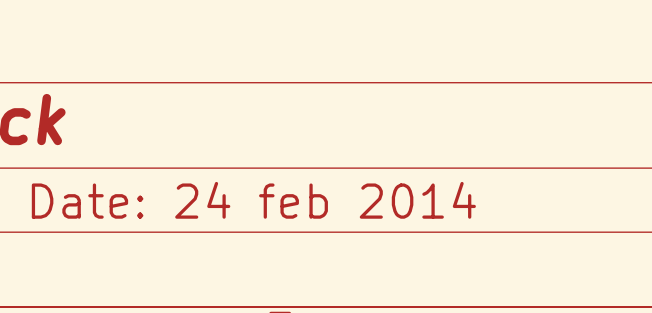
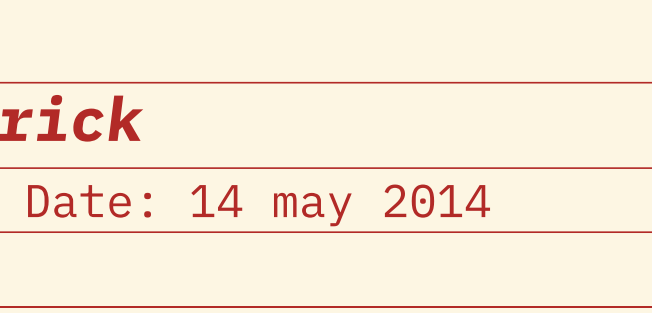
title block: Date: 24 feb 2014 (253, 200) -> Date: 14 may 2014 (259, 205)

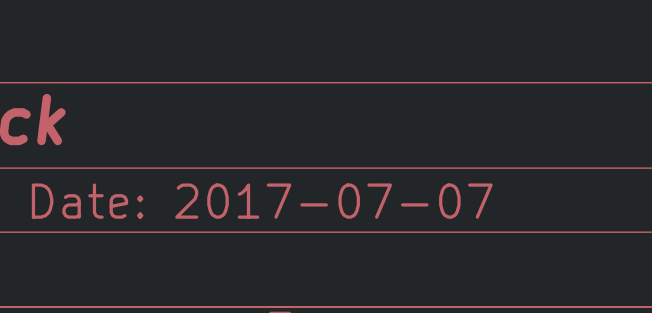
title block: Date: 14 may 2014 (259, 205) -> Date: 2017-07-07 (262, 201)

